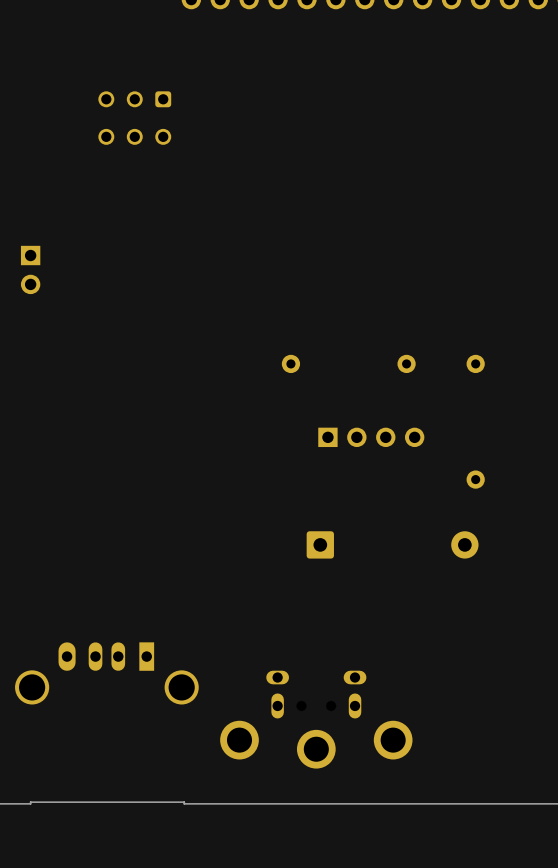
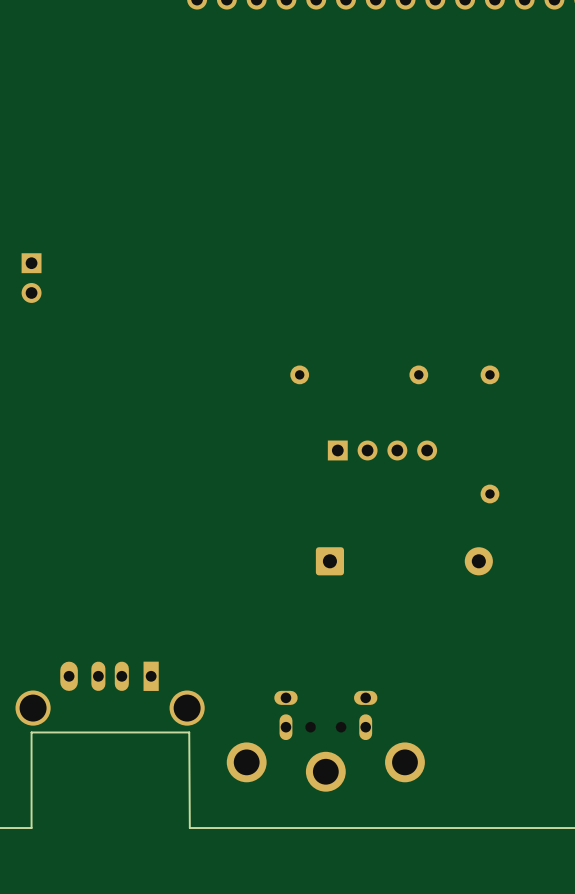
part: (134, 118) -> none
board edge: (184, 802) (30, 802) -> (189, 826) (189, 732) (31, 732) (31, 826)

